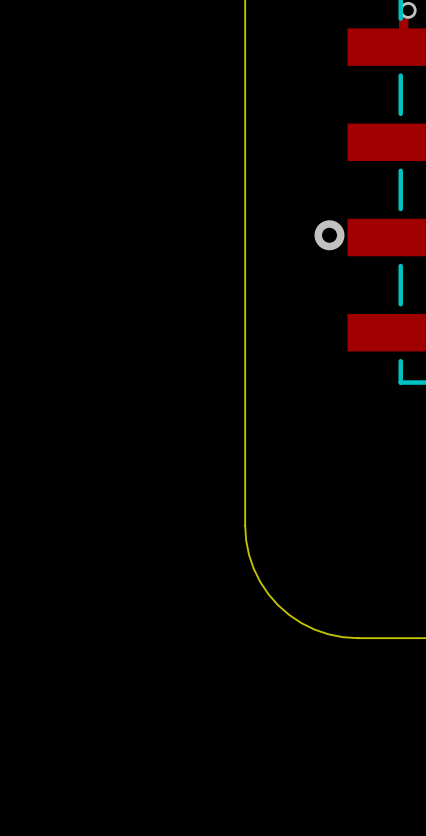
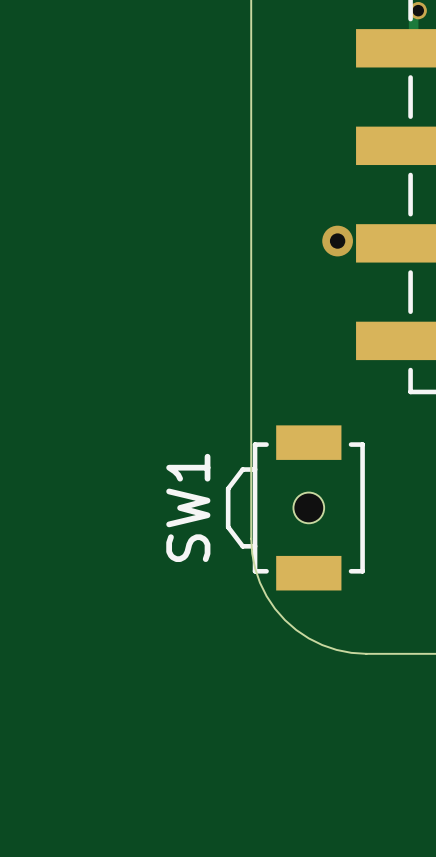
SW1: none -> (295, 507)

